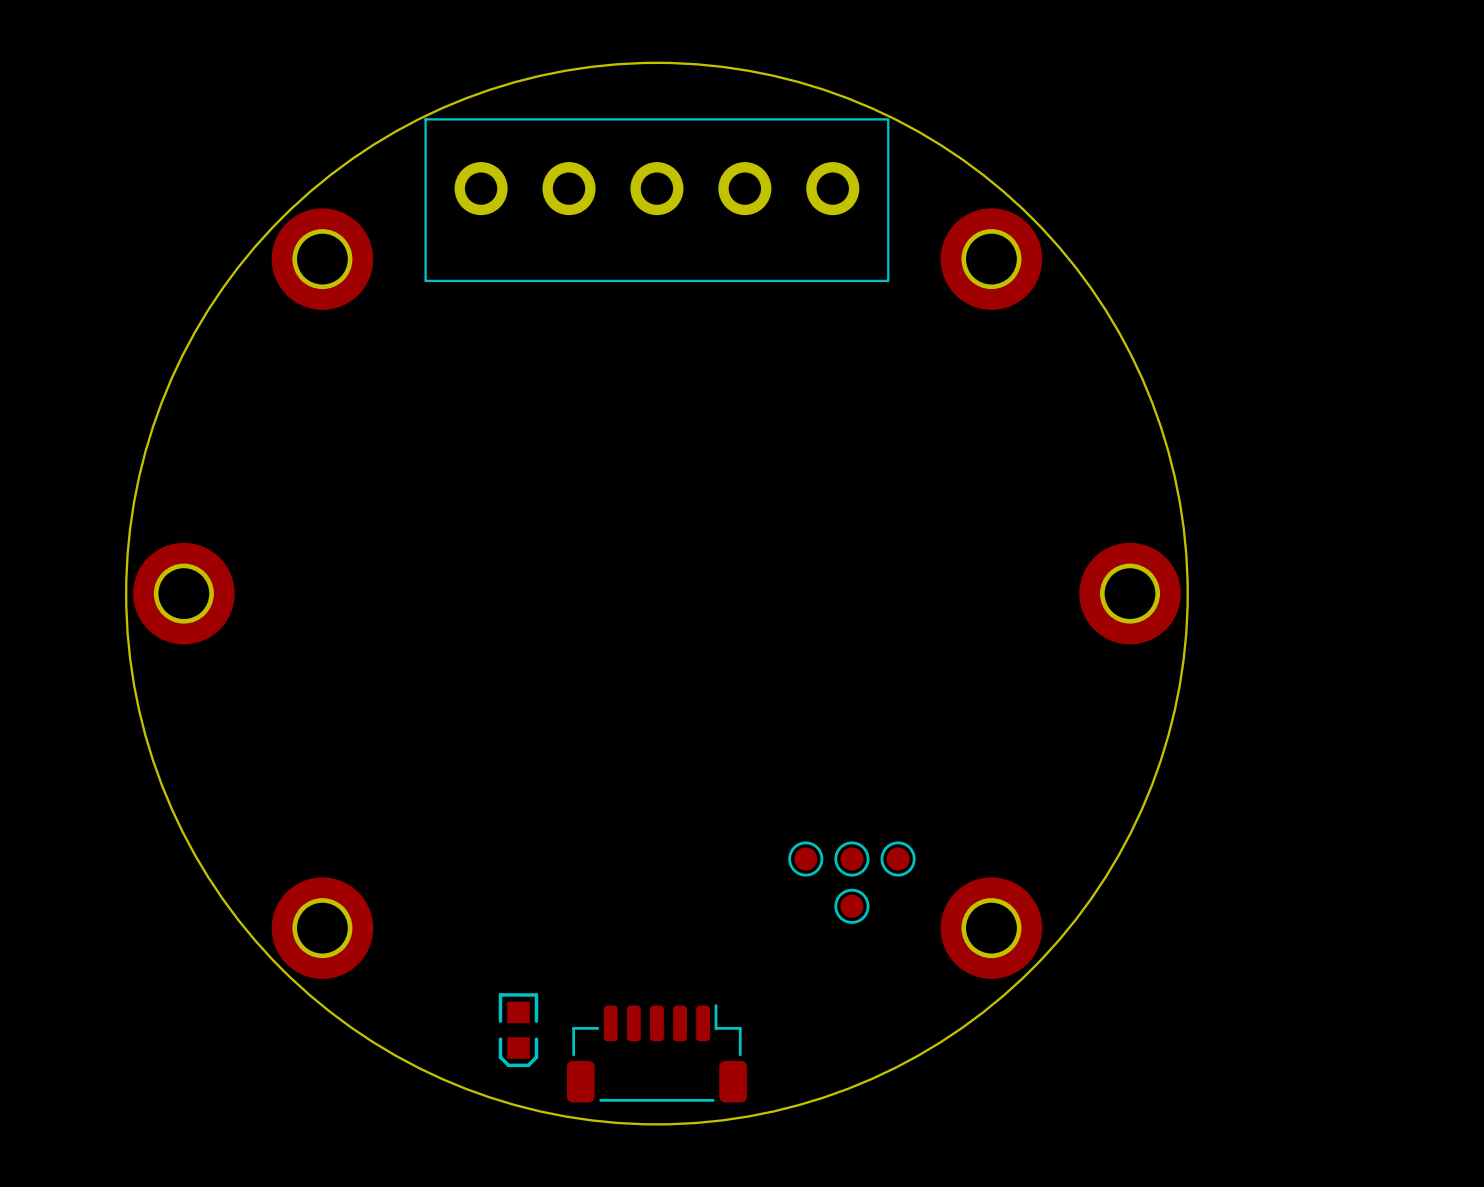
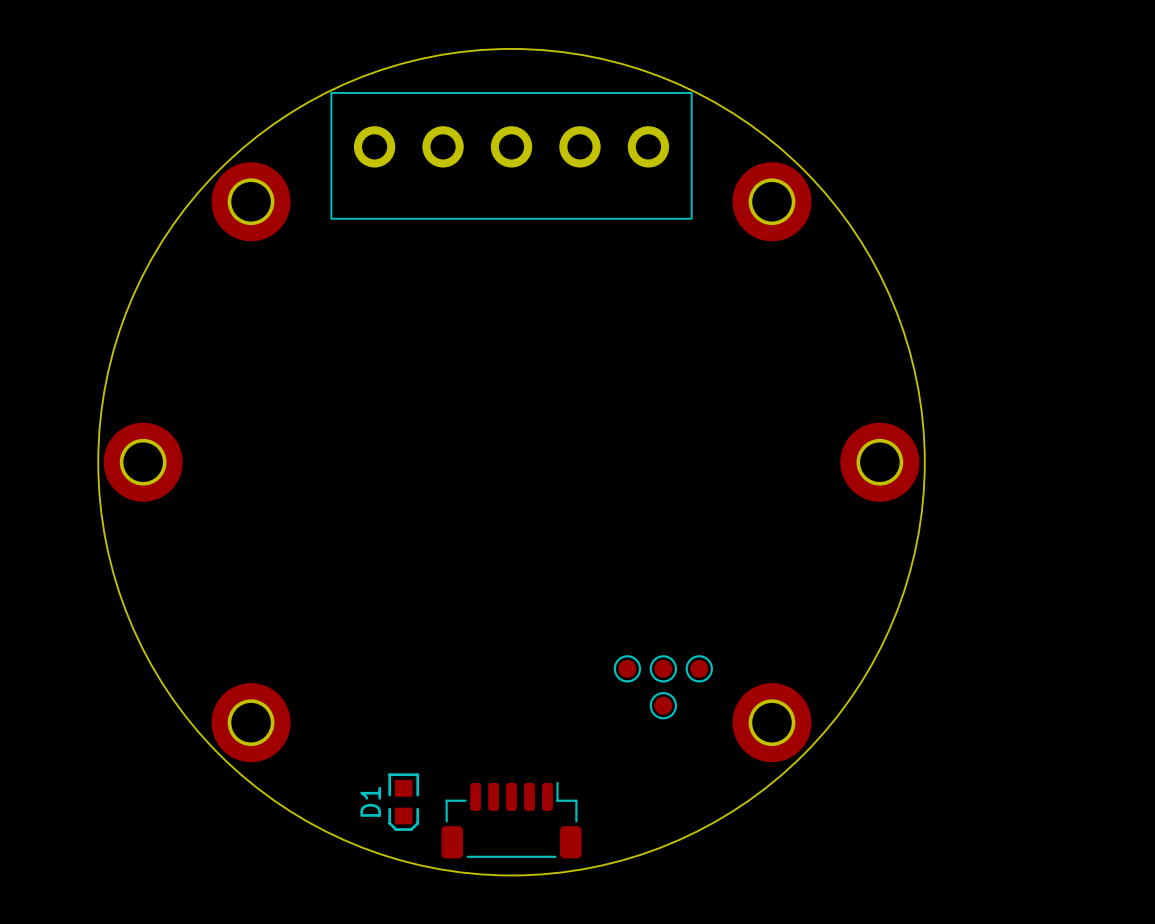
D1 name: none -> D1 (370, 801)

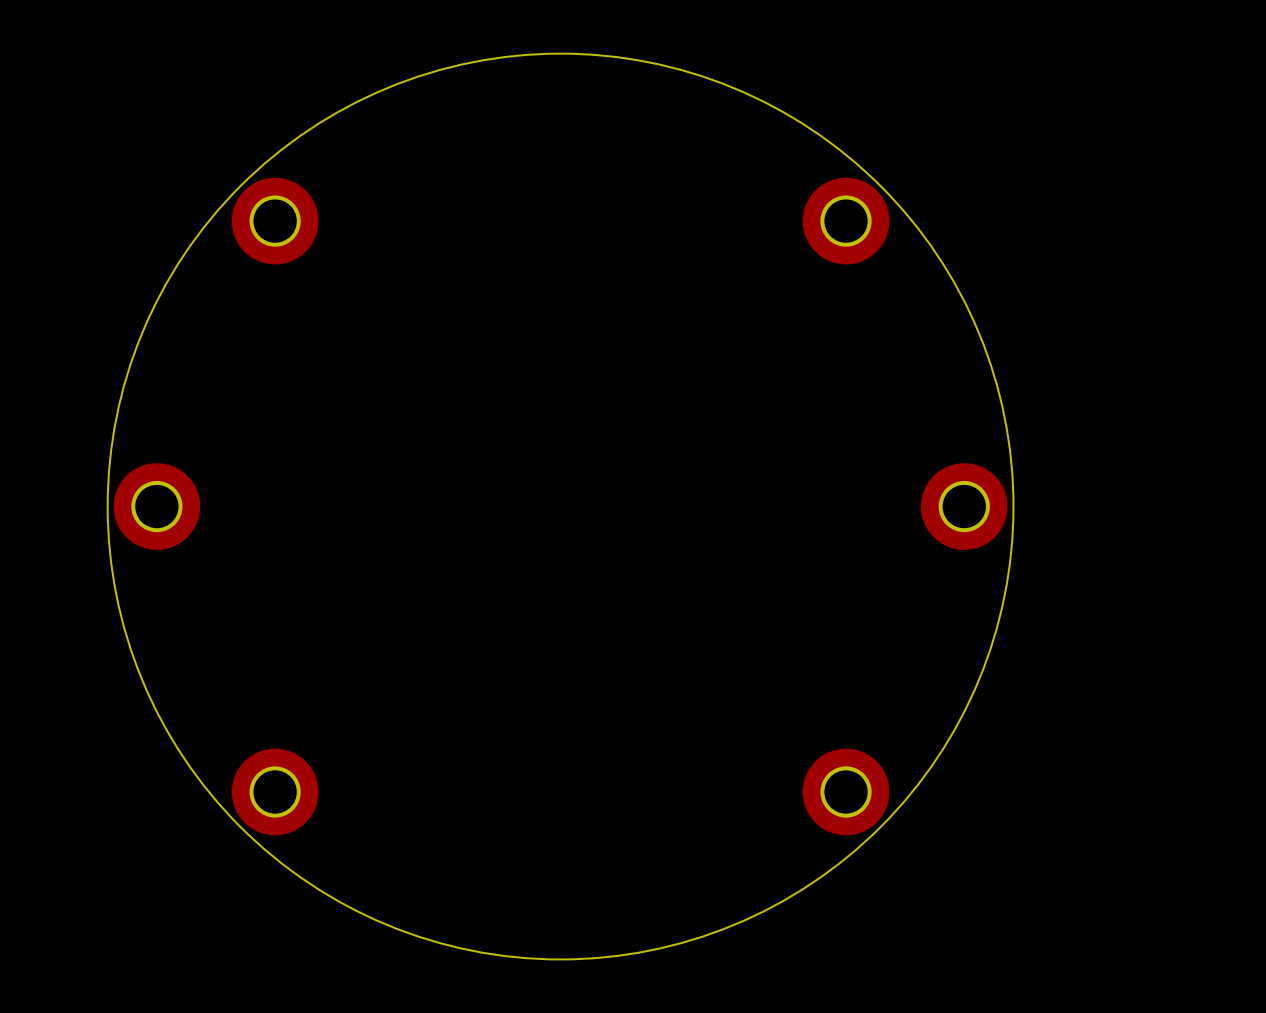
part: (511, 155) -> none
part: (627, 668) -> none
part: (663, 668) -> none
part: (699, 668) -> none
part: (663, 705) -> none
D1: (403, 802) -> none
part: (511, 820) -> none

